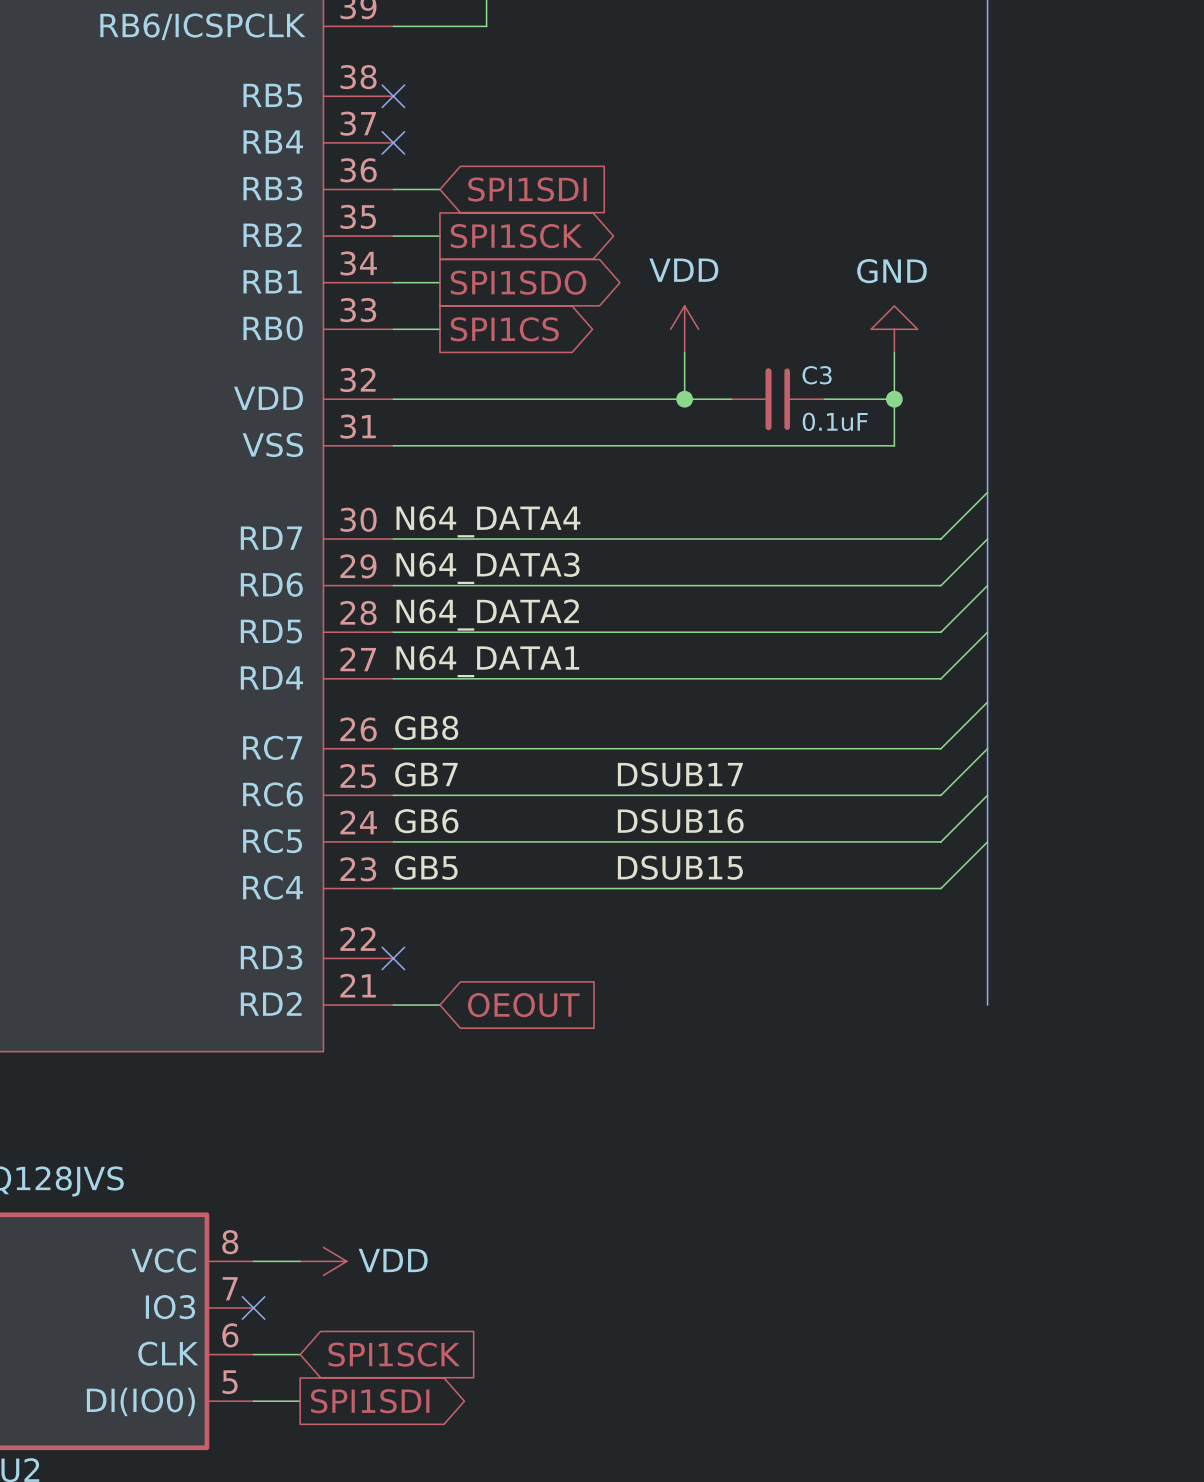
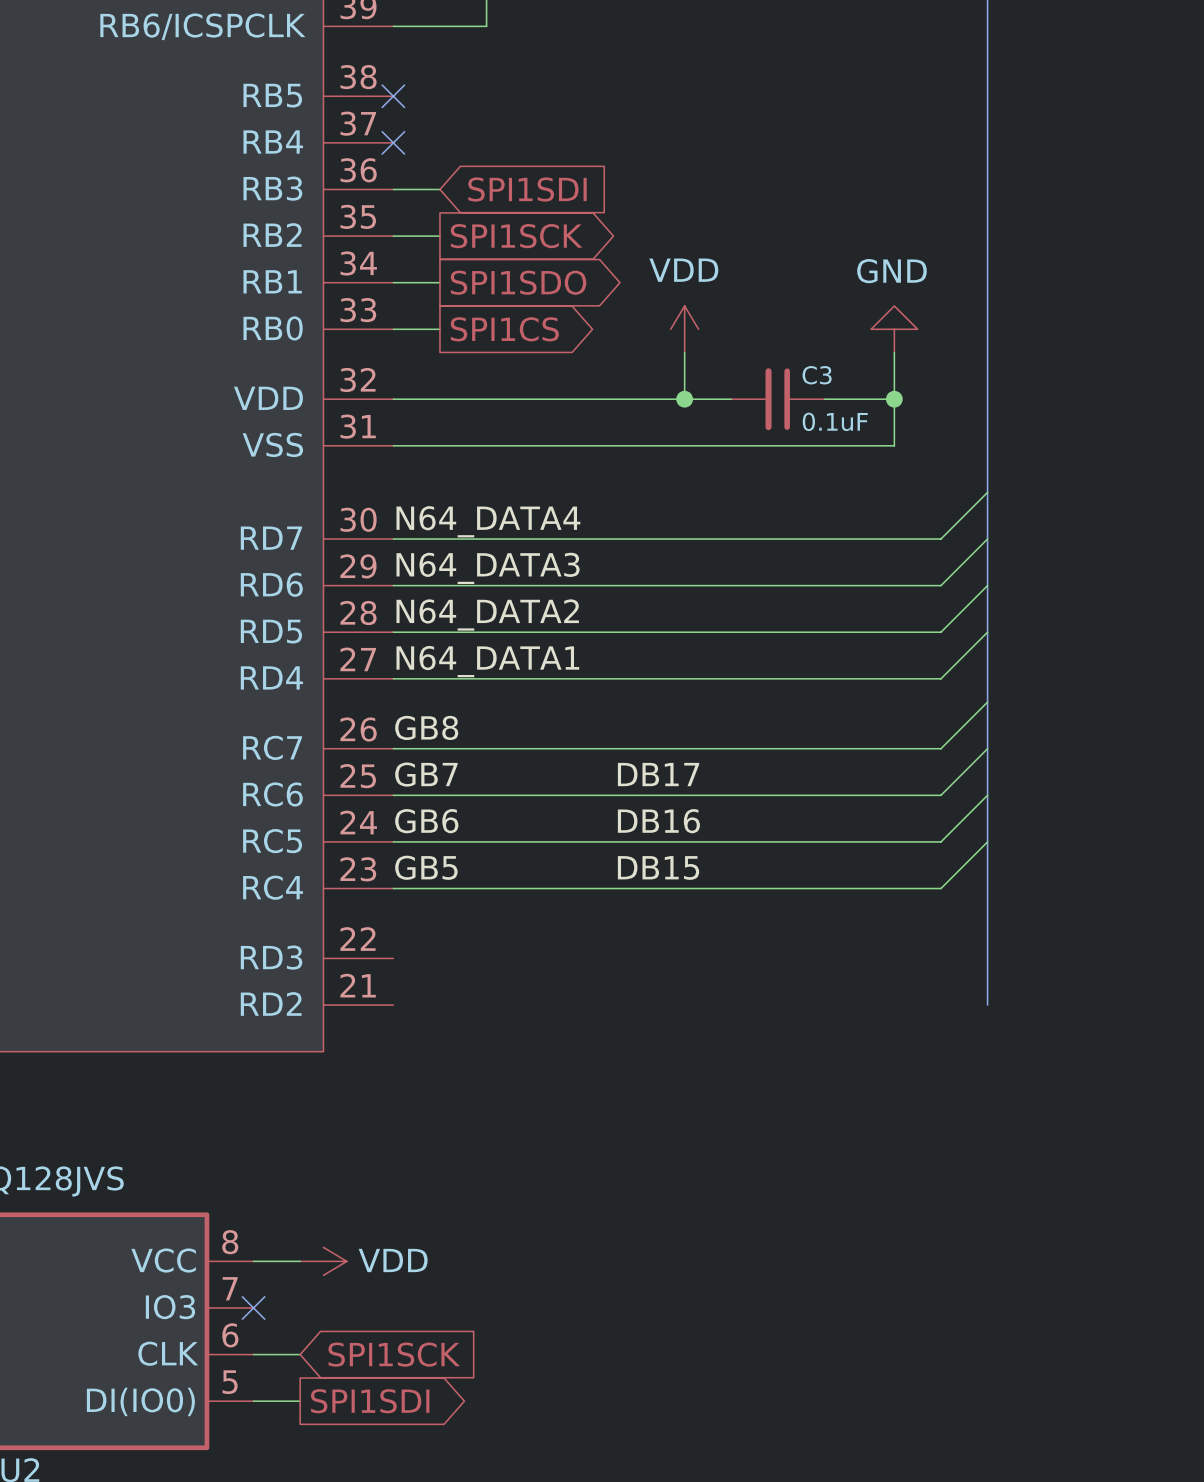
label: DSUB17 (680, 774) -> DB17 (658, 774)
label: DSUB16 (680, 821) -> DB16 (658, 821)
label: DSUB15 (680, 867) -> DB15 (658, 867)
no-connect mark: (393, 958) -> none
wire: (393, 1005) (439, 1005) -> none
global label: OEOUT (523, 1005) -> none

